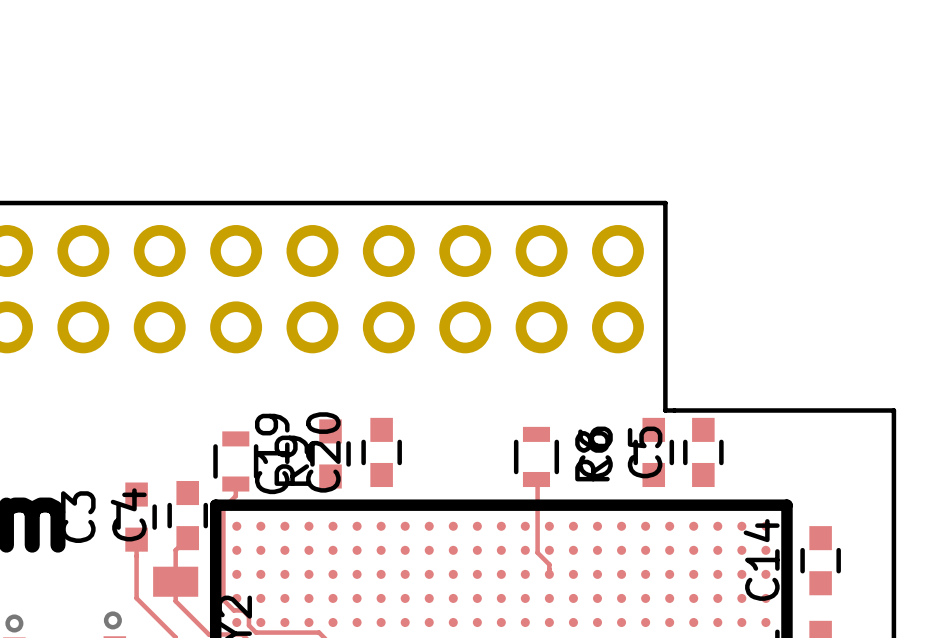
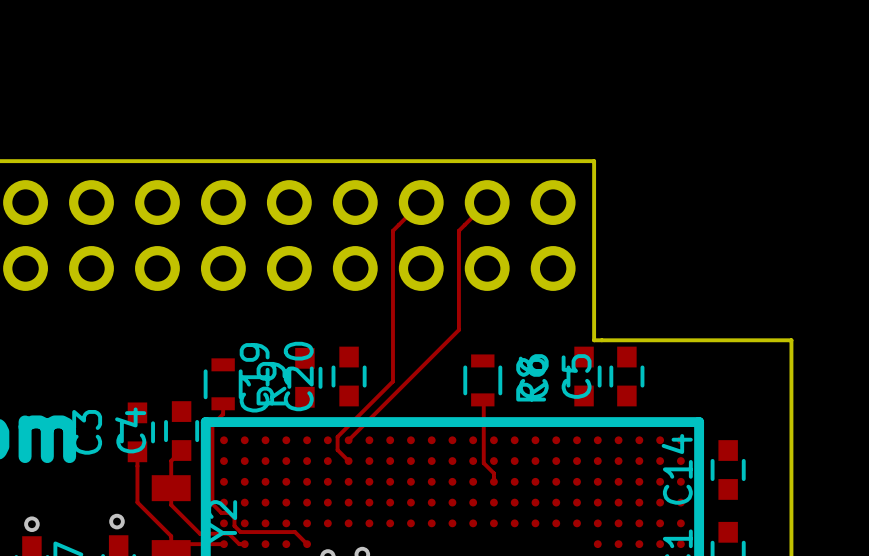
track: none -> (421, 202) (392, 230) (392, 381) (337, 436) (337, 450) (348, 461)
track: none -> (487, 202) (458, 230) (458, 329) (348, 440)

